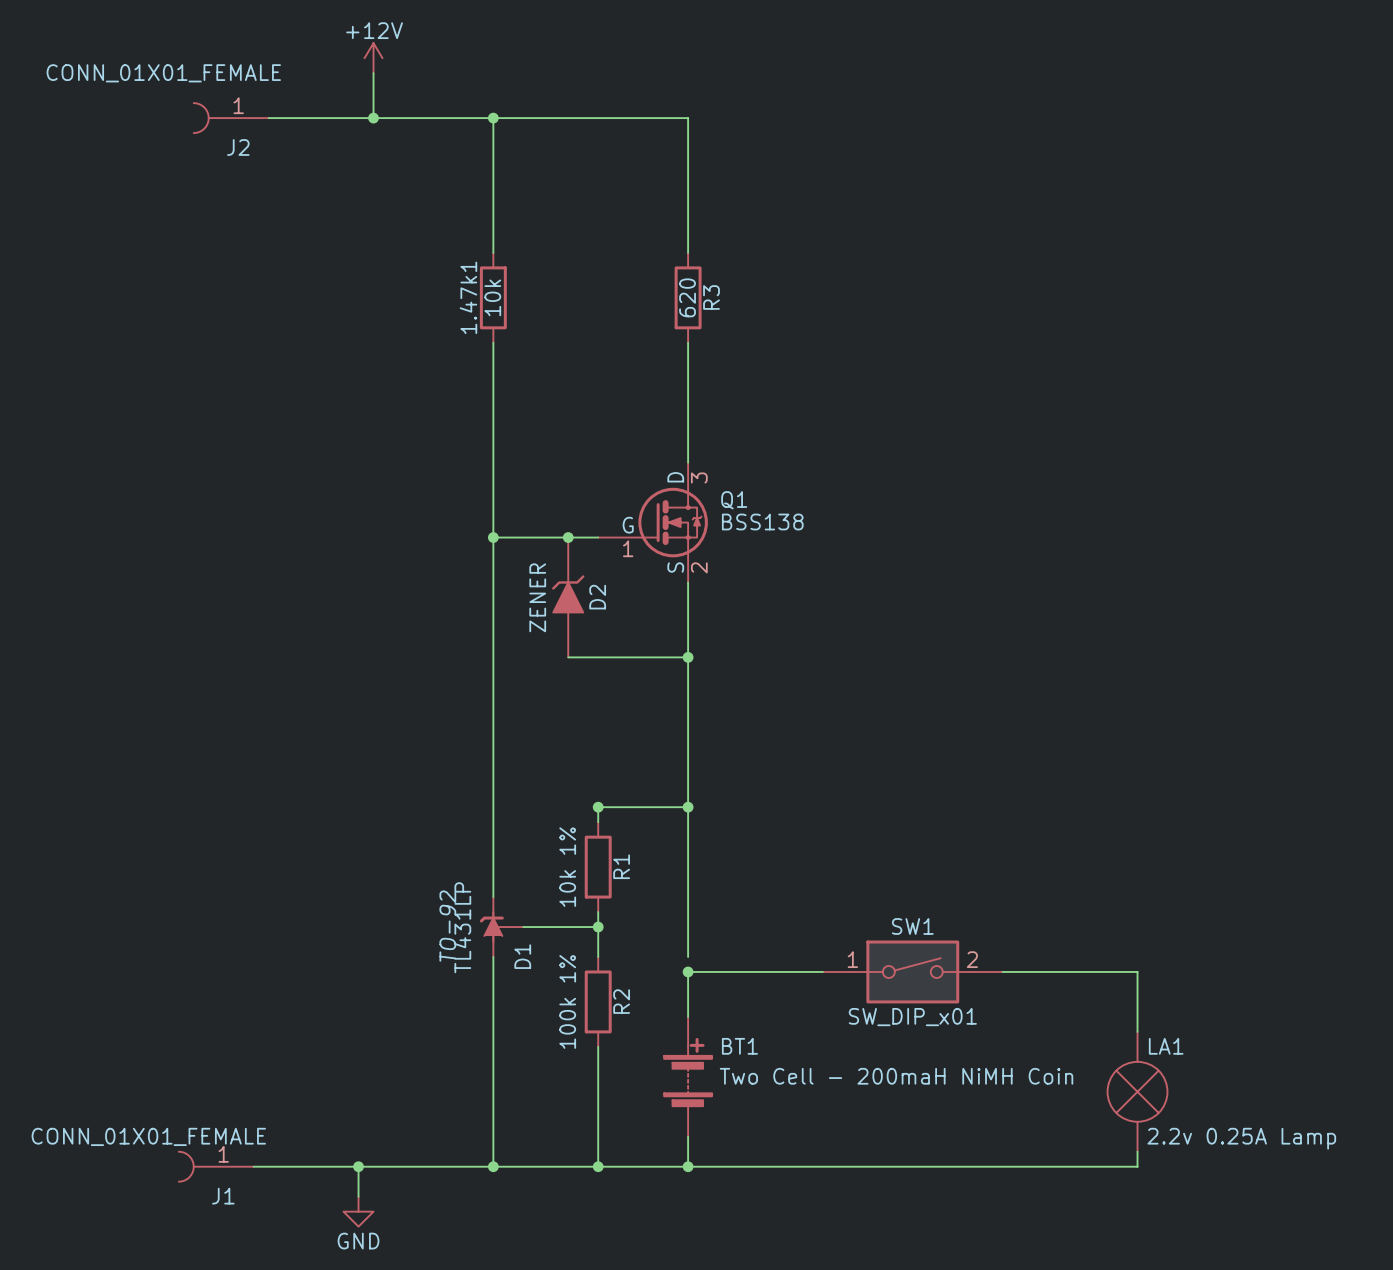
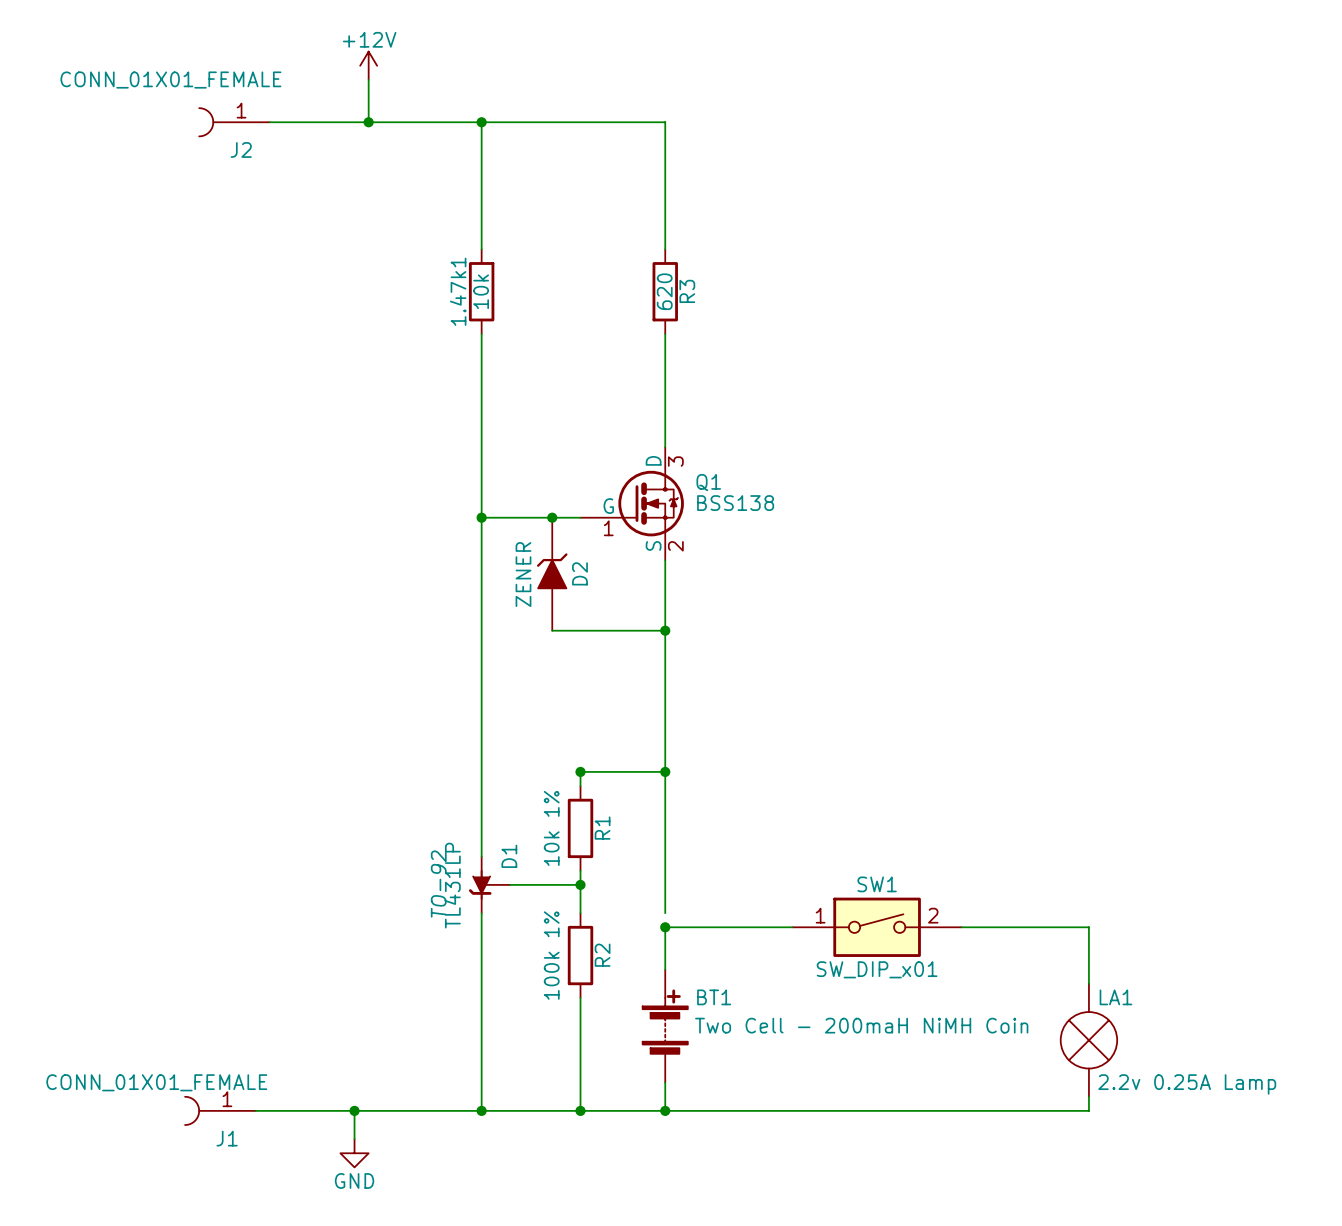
D1 flip: as is (491, 927) -> up-down (480, 884)

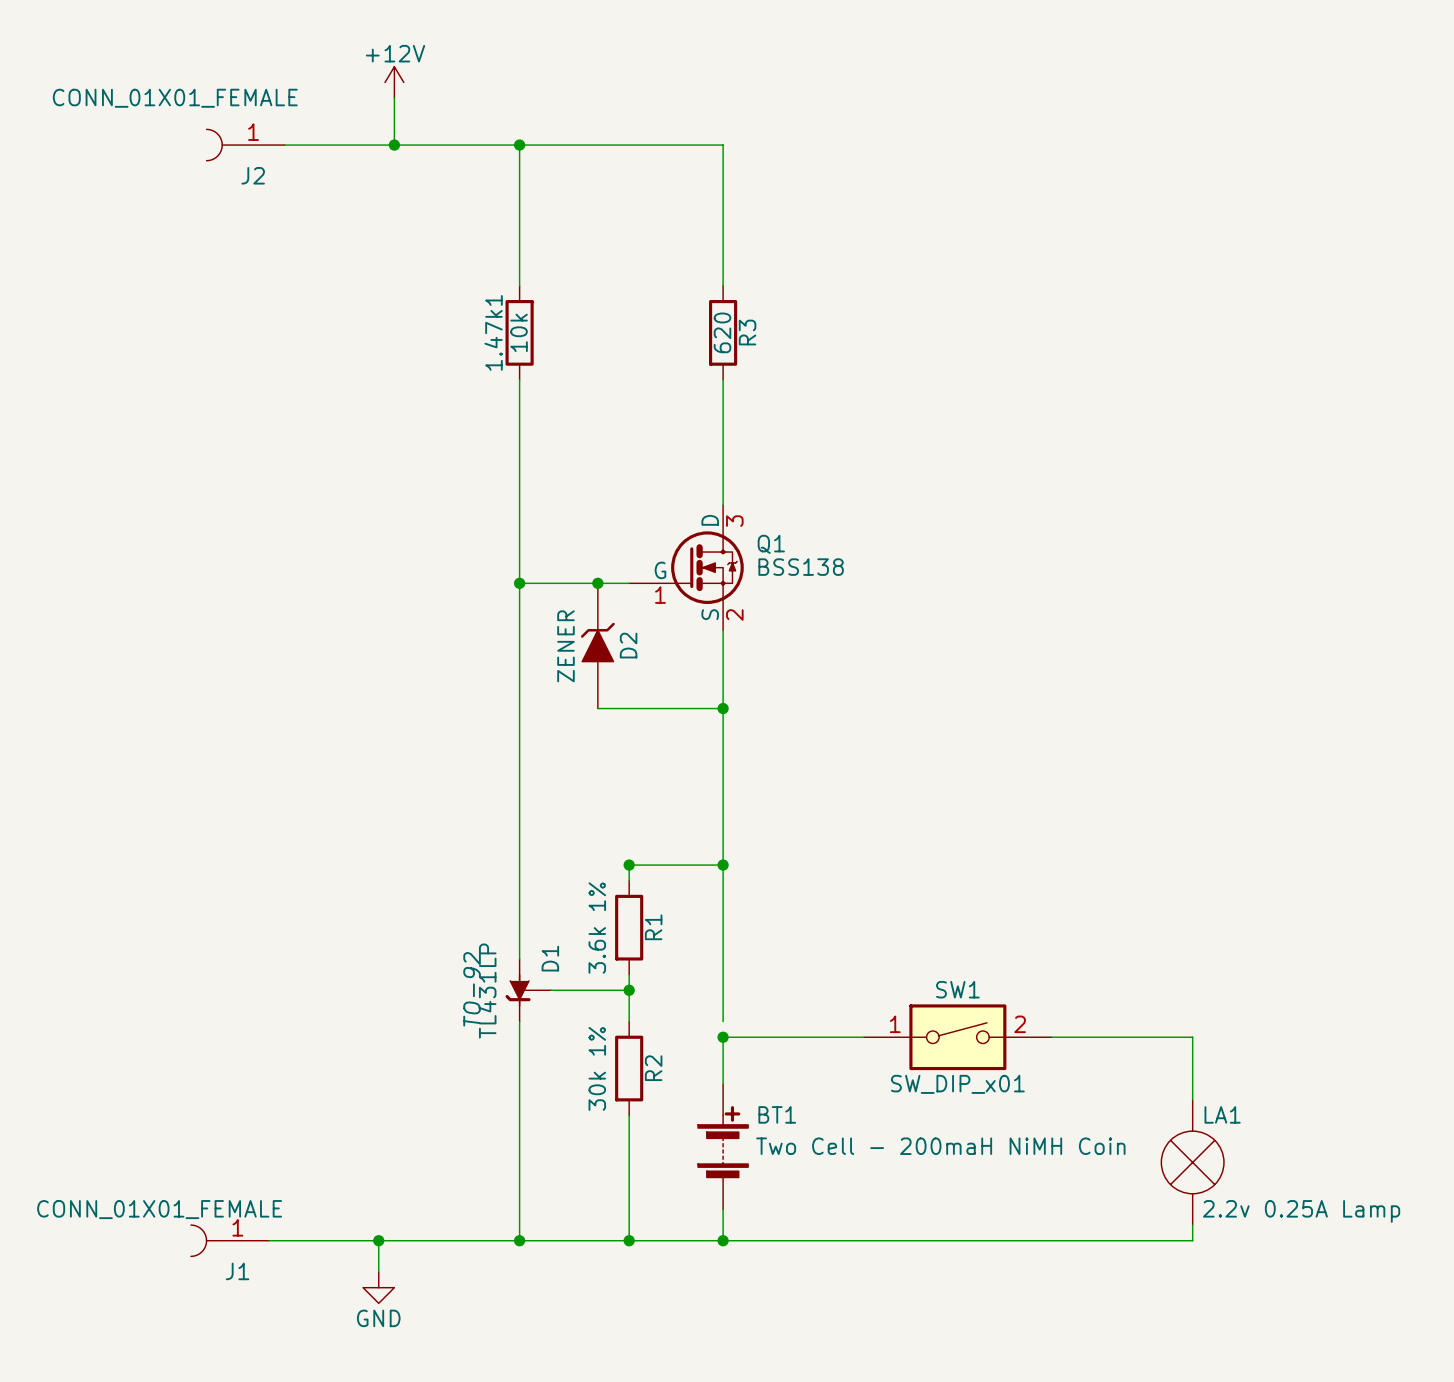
R1 value: 10k 1% (551, 828) -> 3.6k 1% (597, 928)
R2 value: 100k 1% (551, 955) -> 30k 1% (597, 1068)

